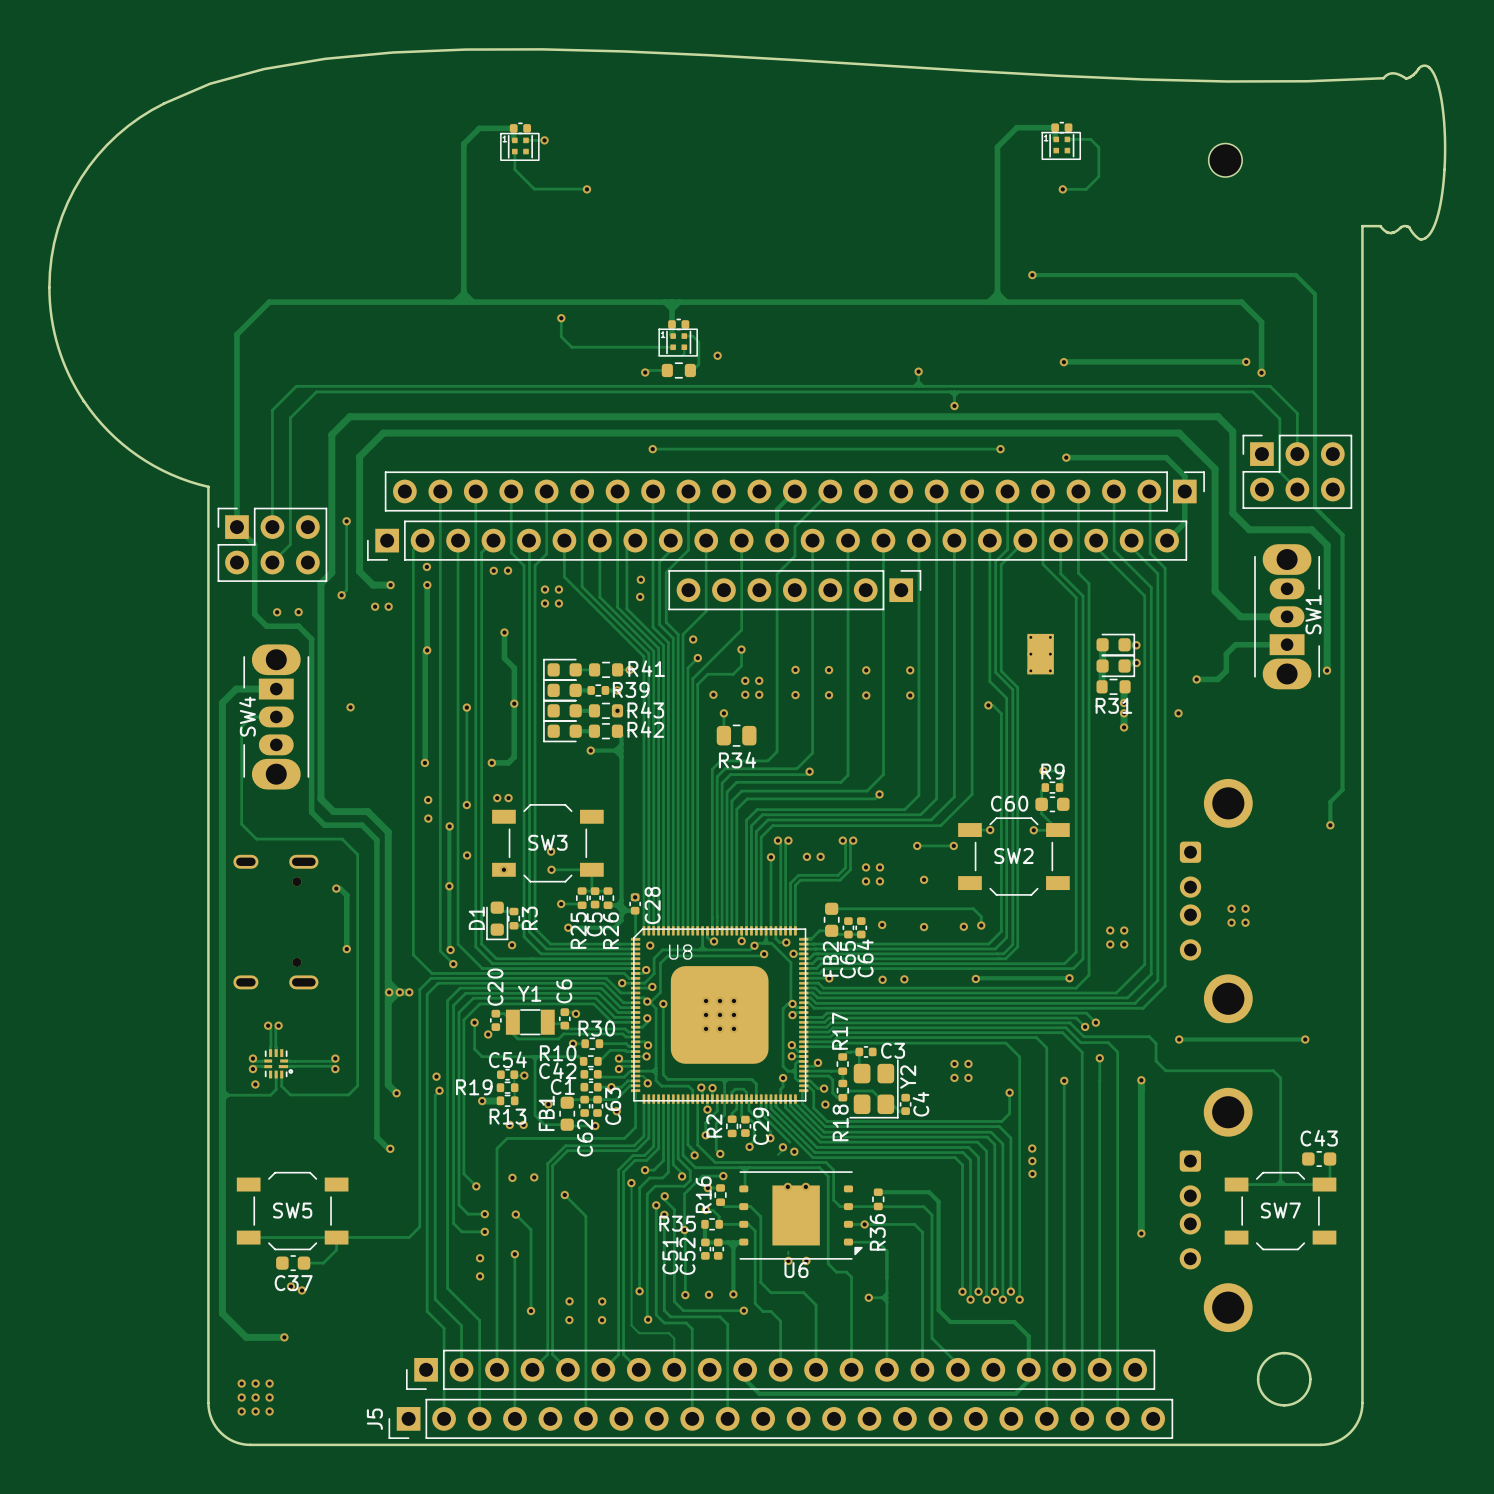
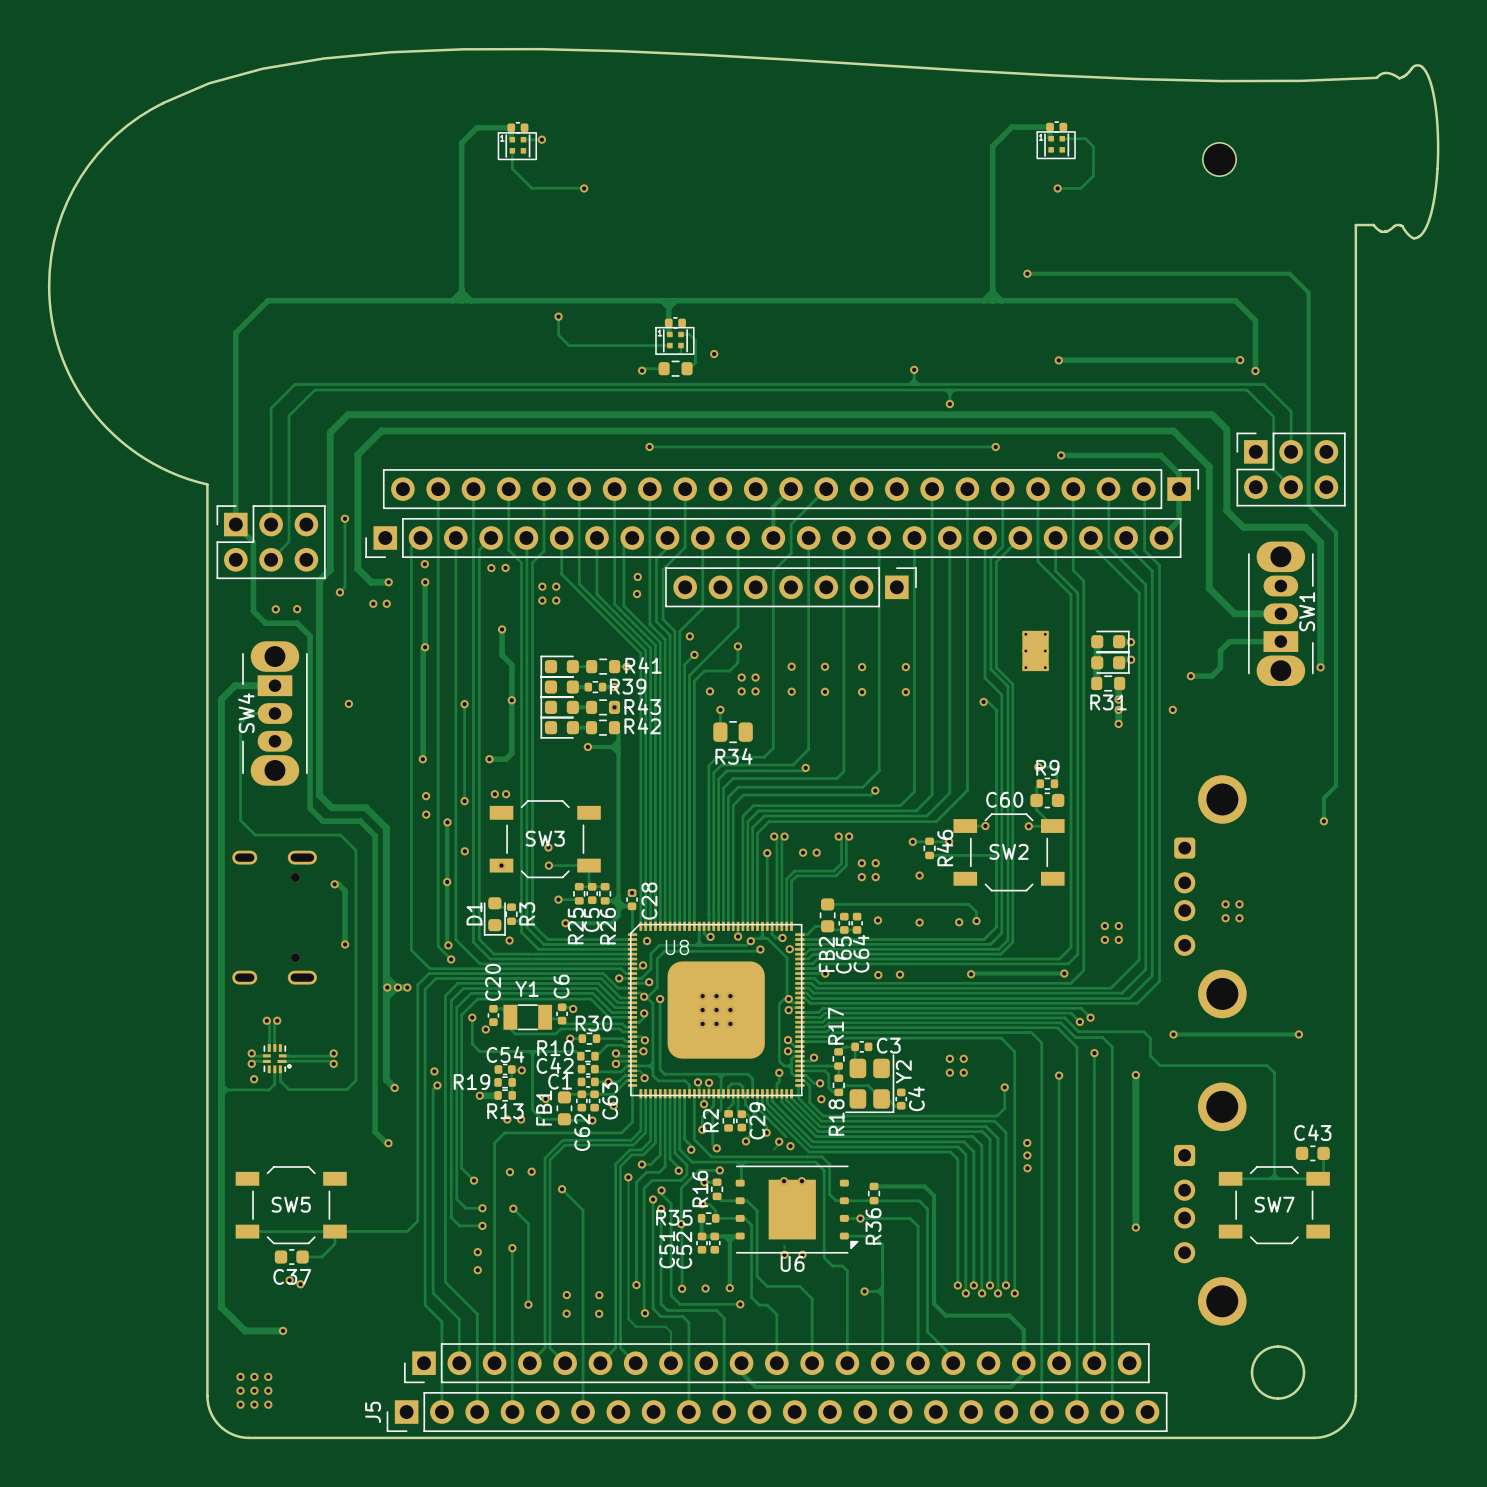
R46: none -> (929, 848)
track: none -> (996, 855) (929, 855)

